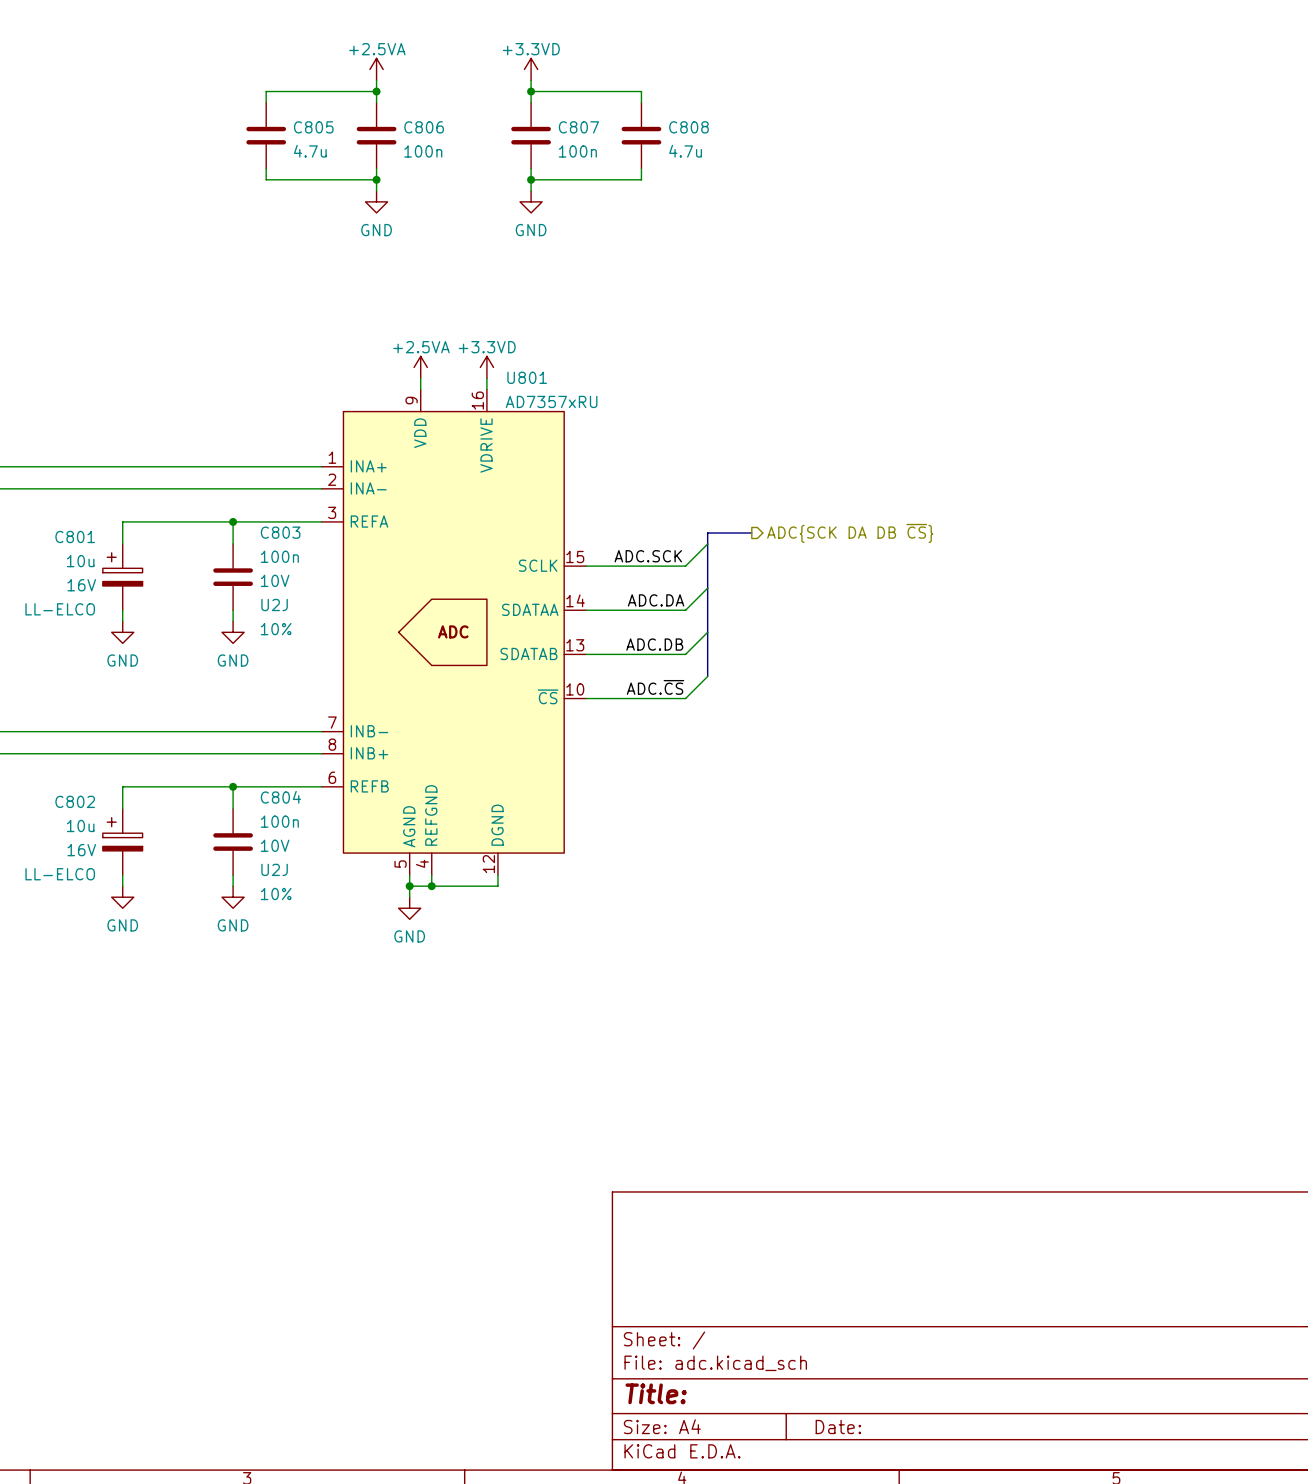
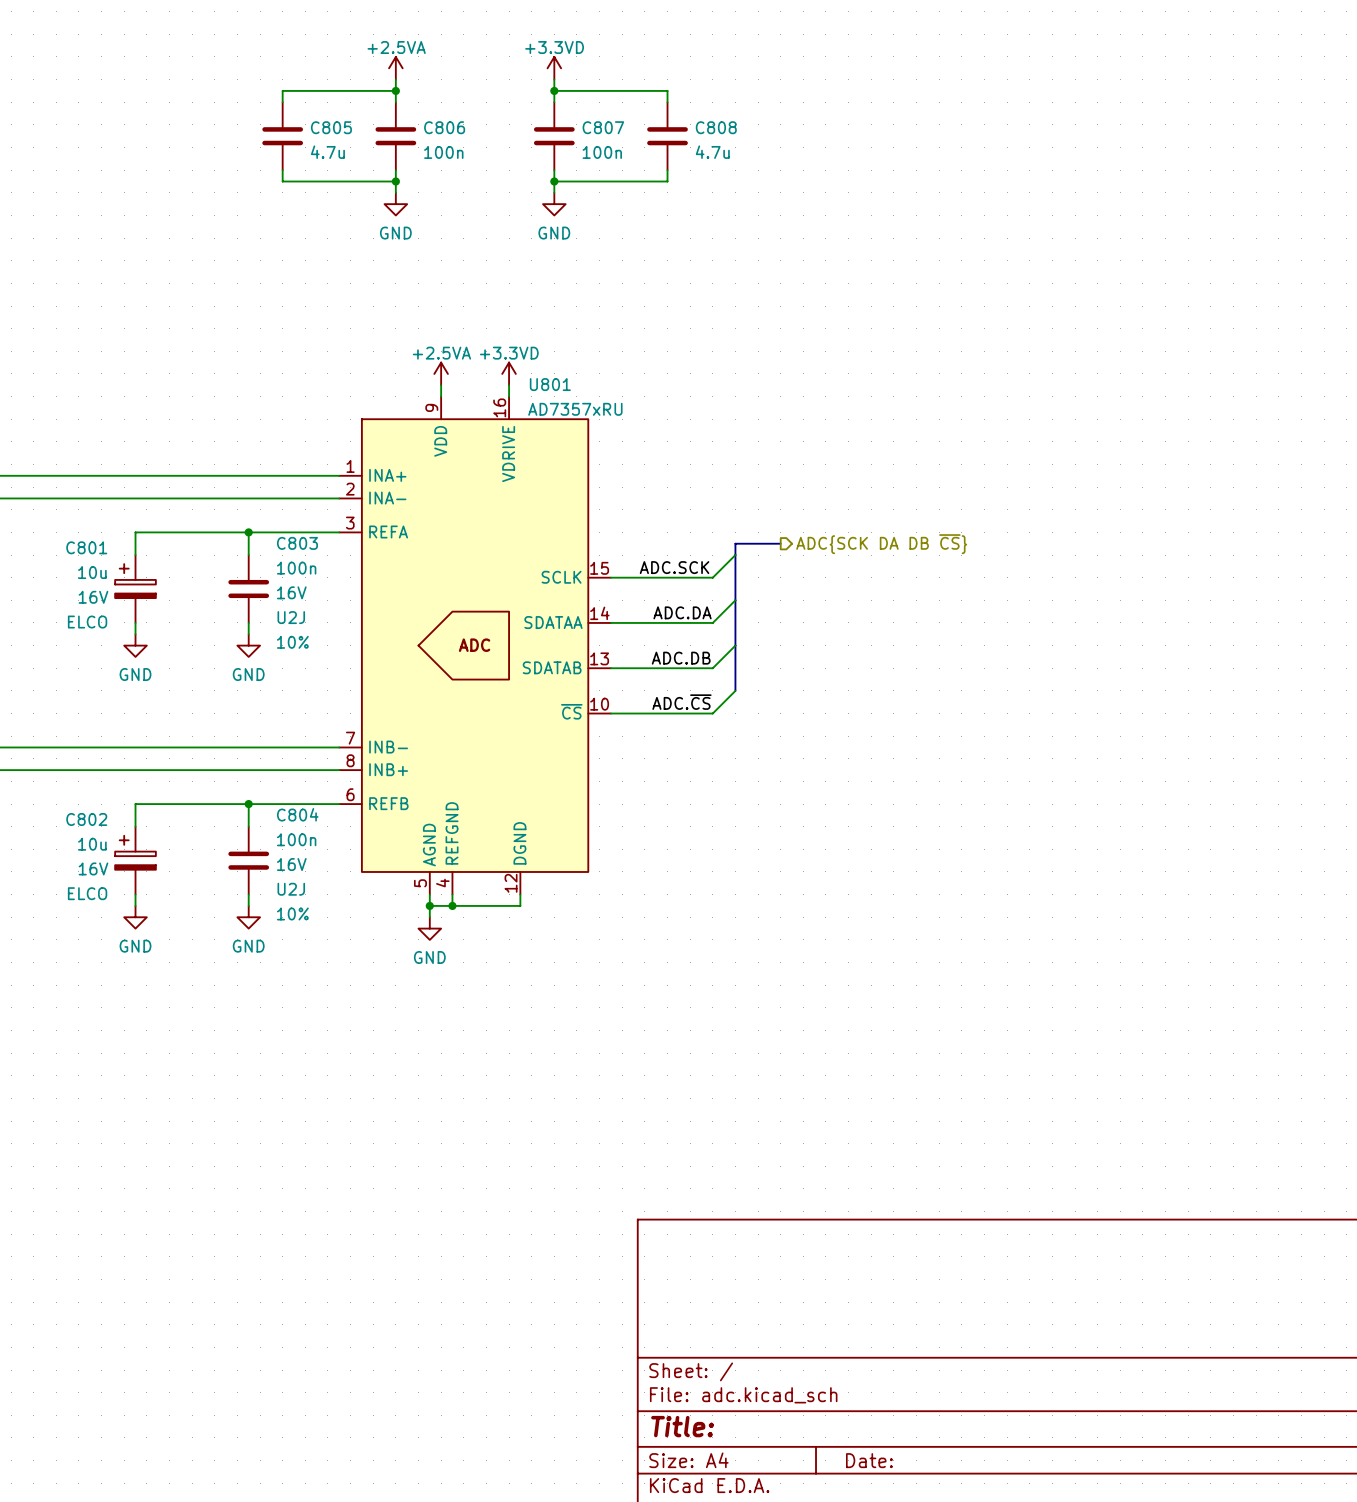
C803 text: 10V (275, 580) -> 16V (291, 592)
C801 text: LL-ELCO (60, 609) -> ELCO (87, 622)
C804 text: 10V (275, 845) -> 16V (291, 864)
C802 text: LL-ELCO (60, 874) -> ELCO (87, 893)

